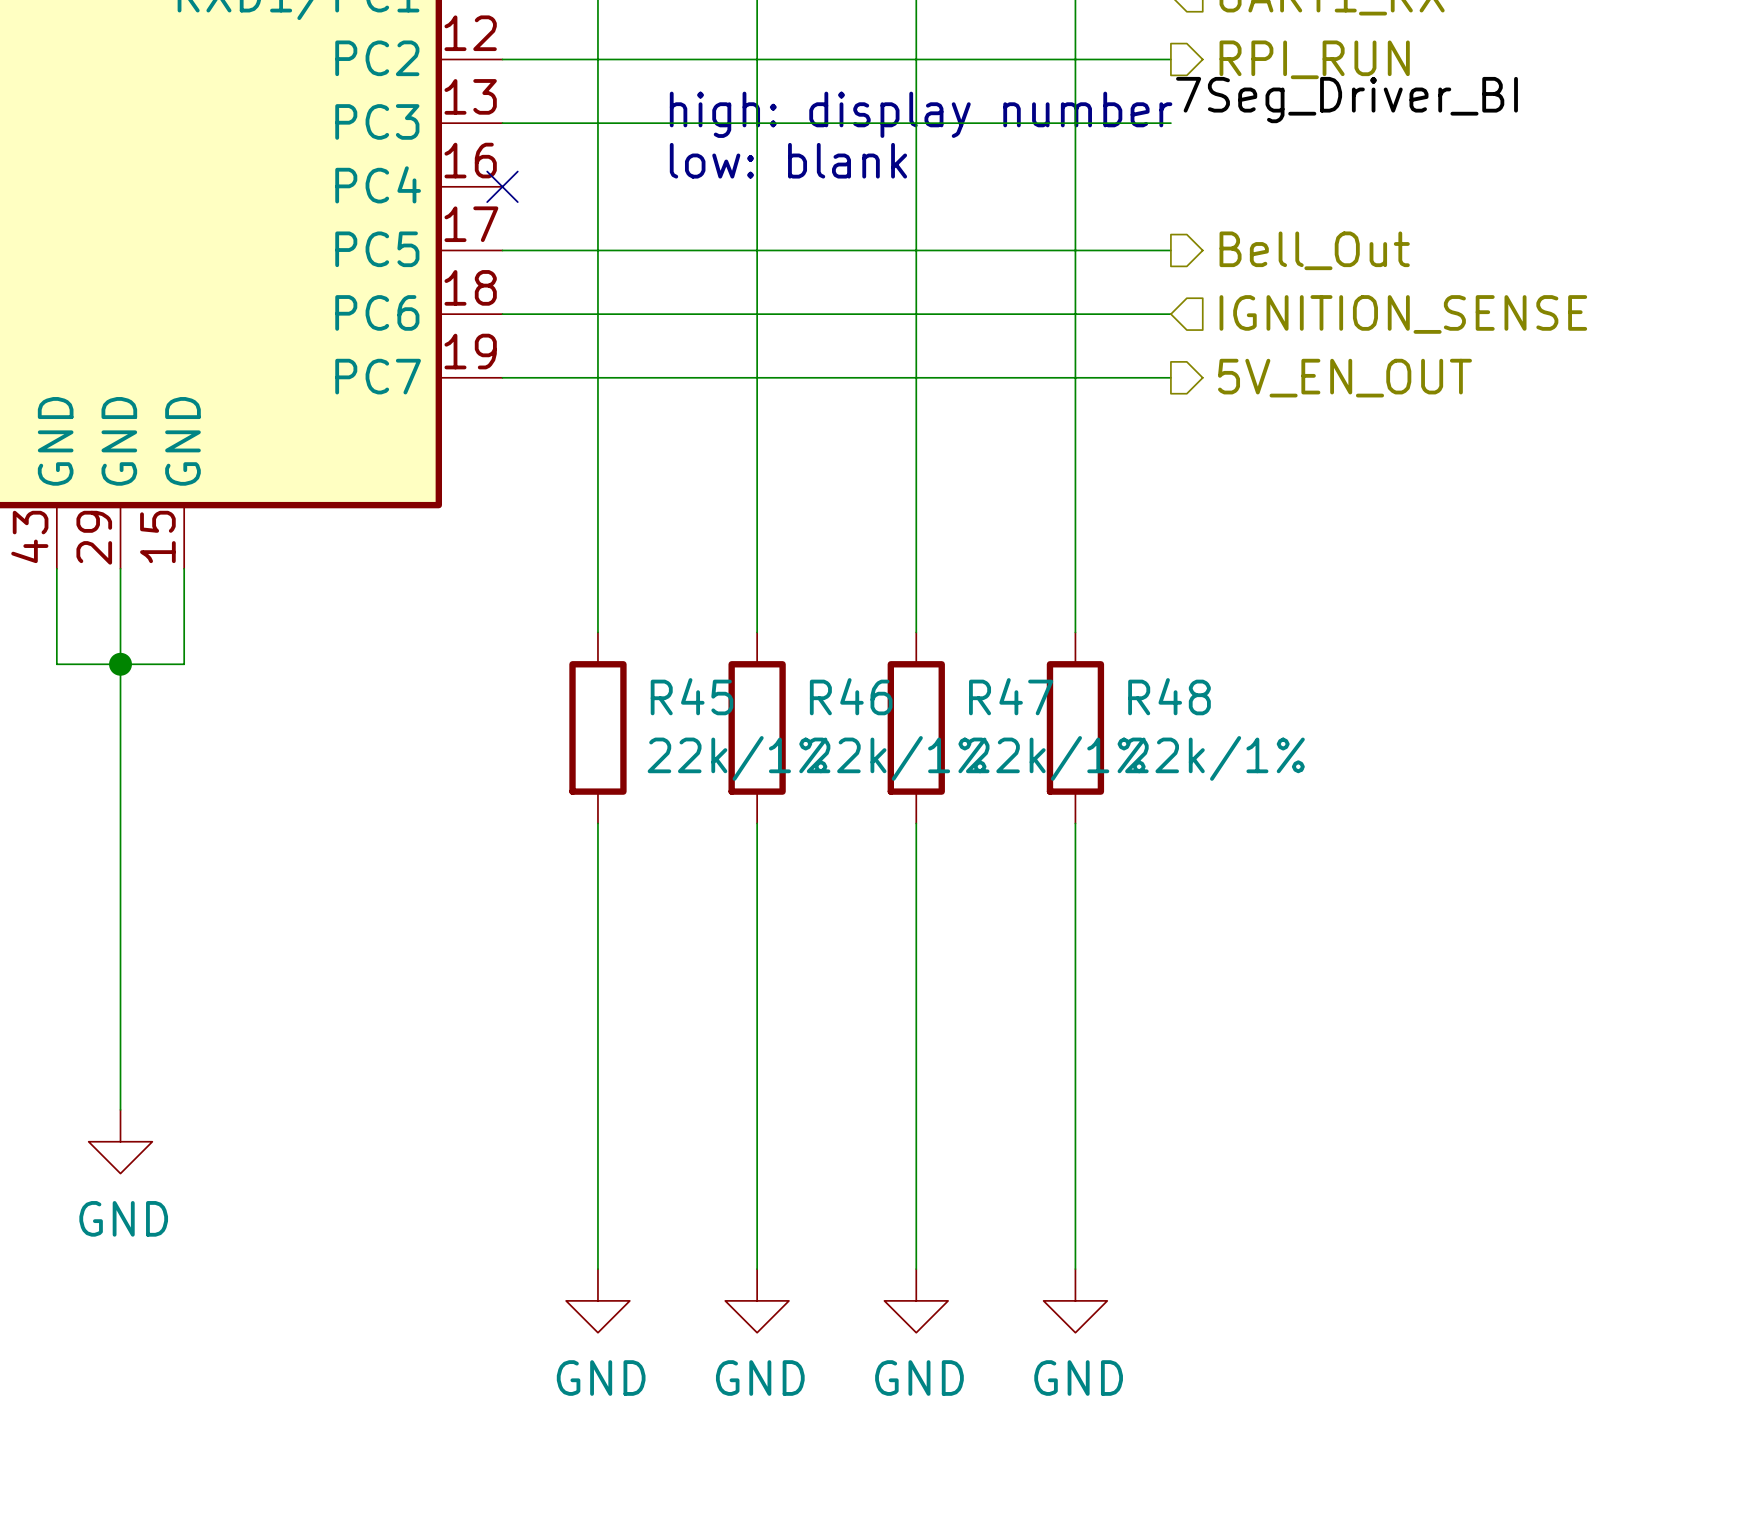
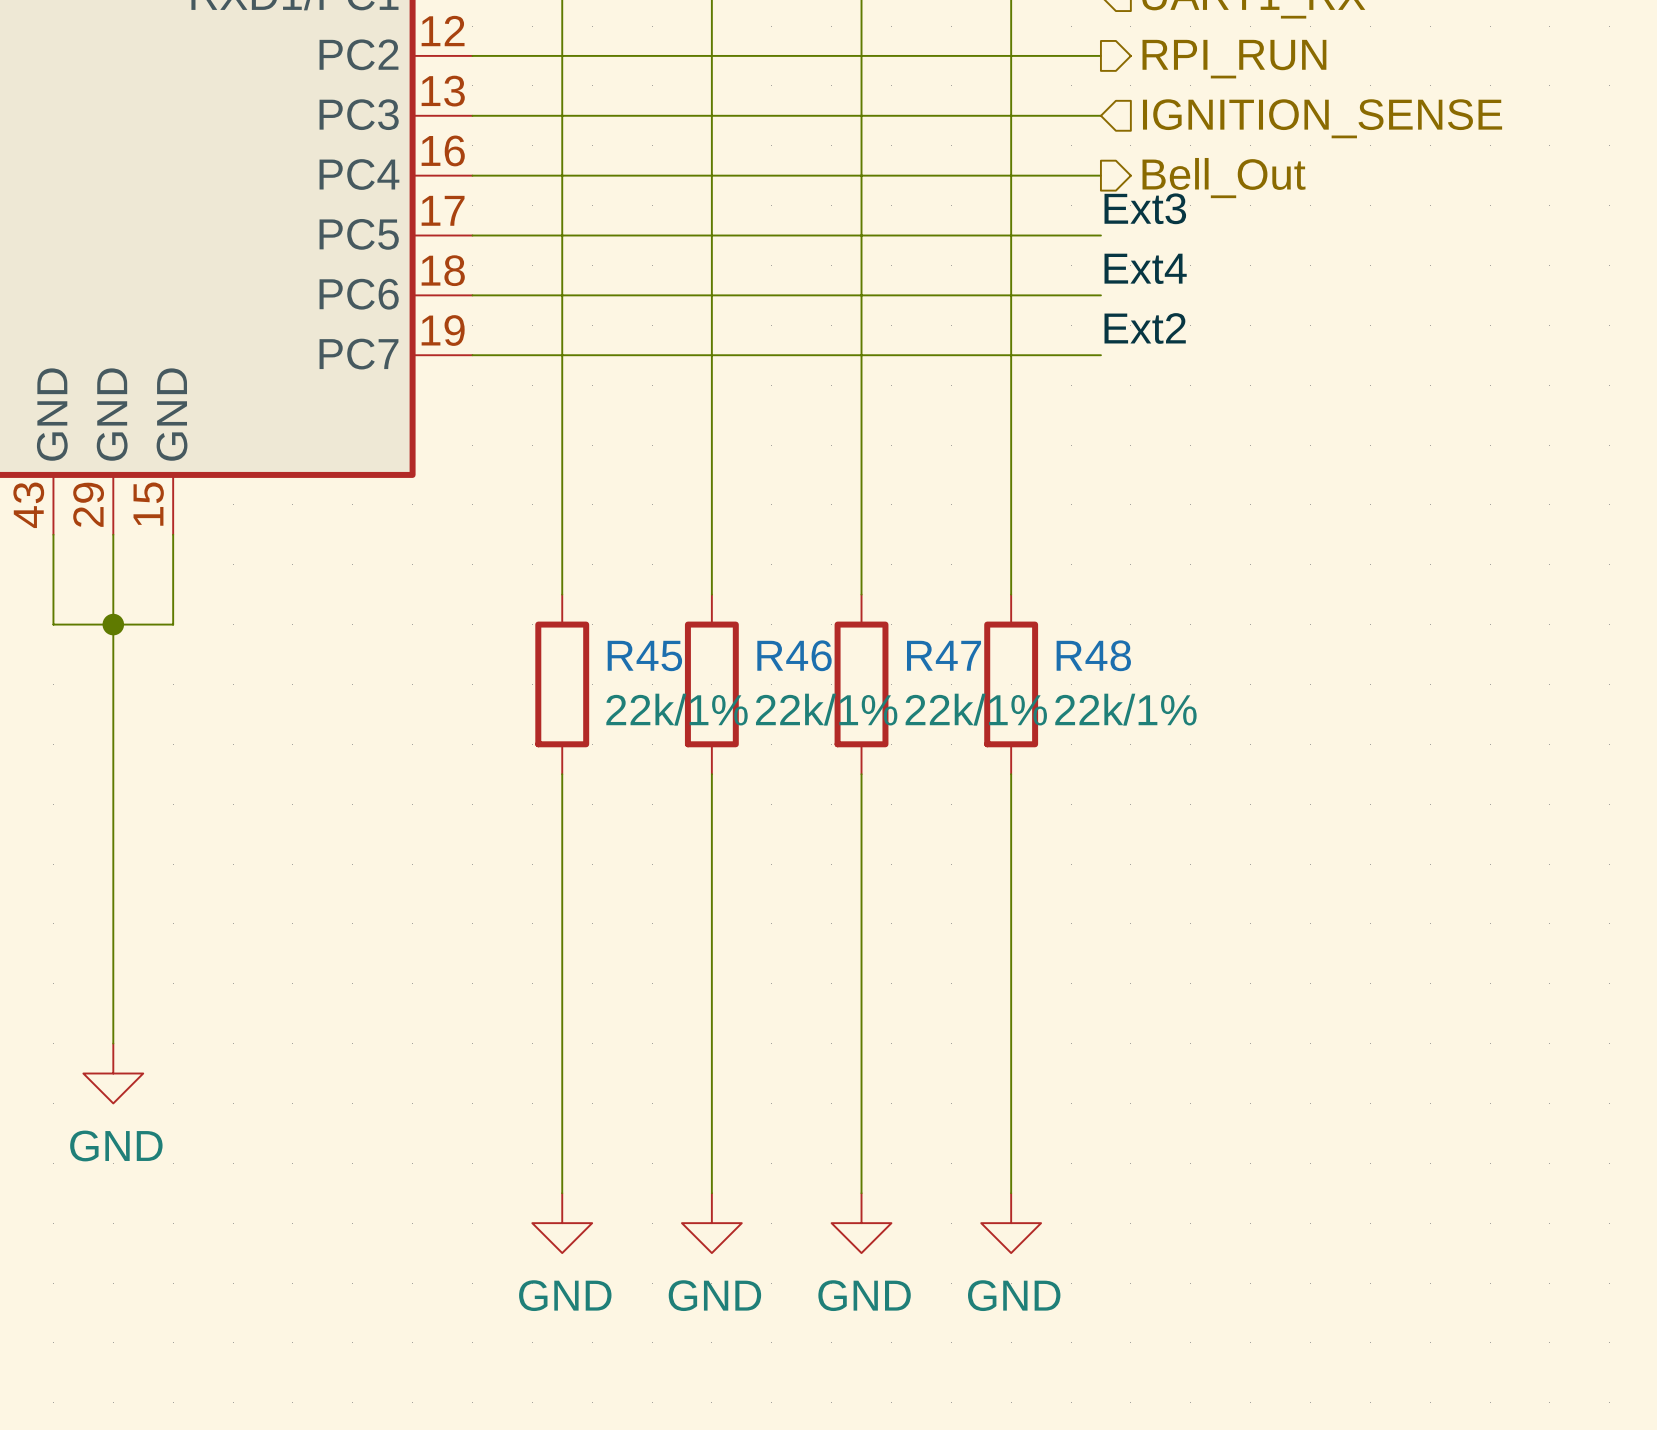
label: 7Seg_Driver_BI (1346, 100) -> none
text: high: display number (921, 114) -> none
text: low: blank (788, 160) -> none
wire: none -> (472, 175) (1100, 175)
no-connect mark: (502, 186) -> none
label: none -> Ext3 (1145, 208)
hierarchical label position: Bell_Out (1314, 250) -> Bell_Out (1224, 178)
label: none -> Ext4 (1145, 268)
hierarchical label position: IGNITION_SENSE (1403, 314) -> IGNITION_SENSE (1322, 118)
label: none -> Ext2 (1145, 328)
hierarchical label: 5V_EN_OUT (1344, 378) -> none

